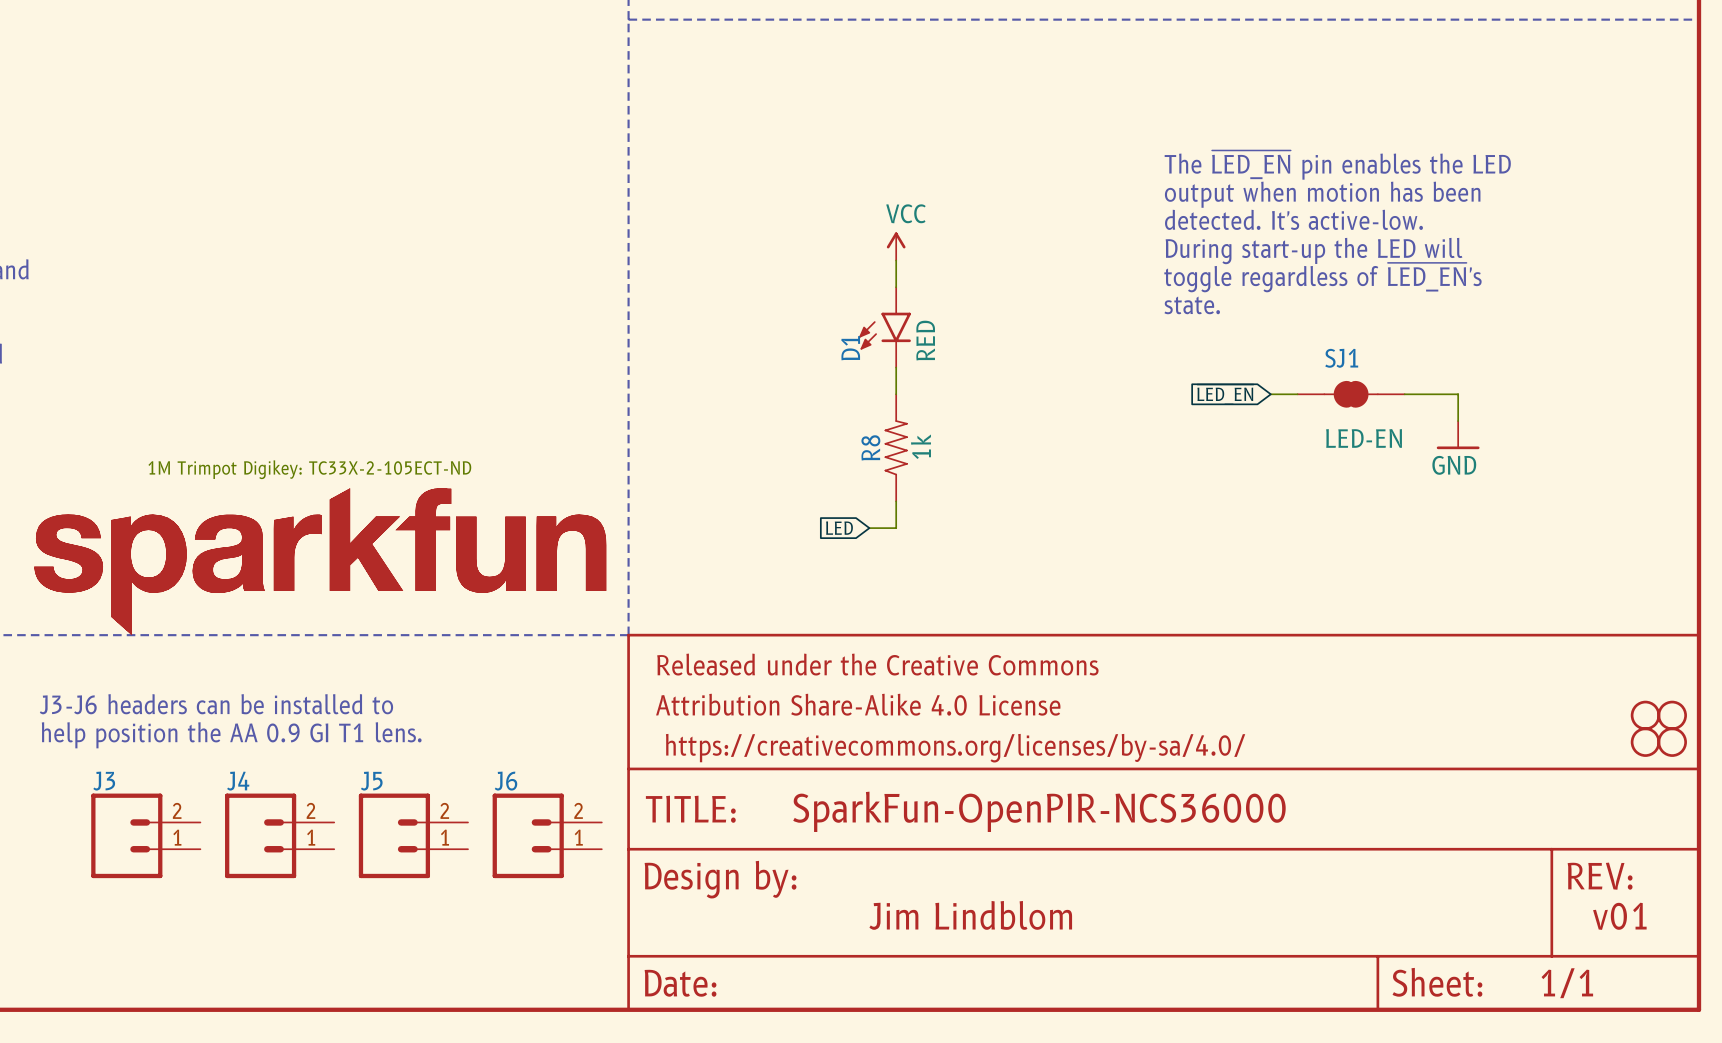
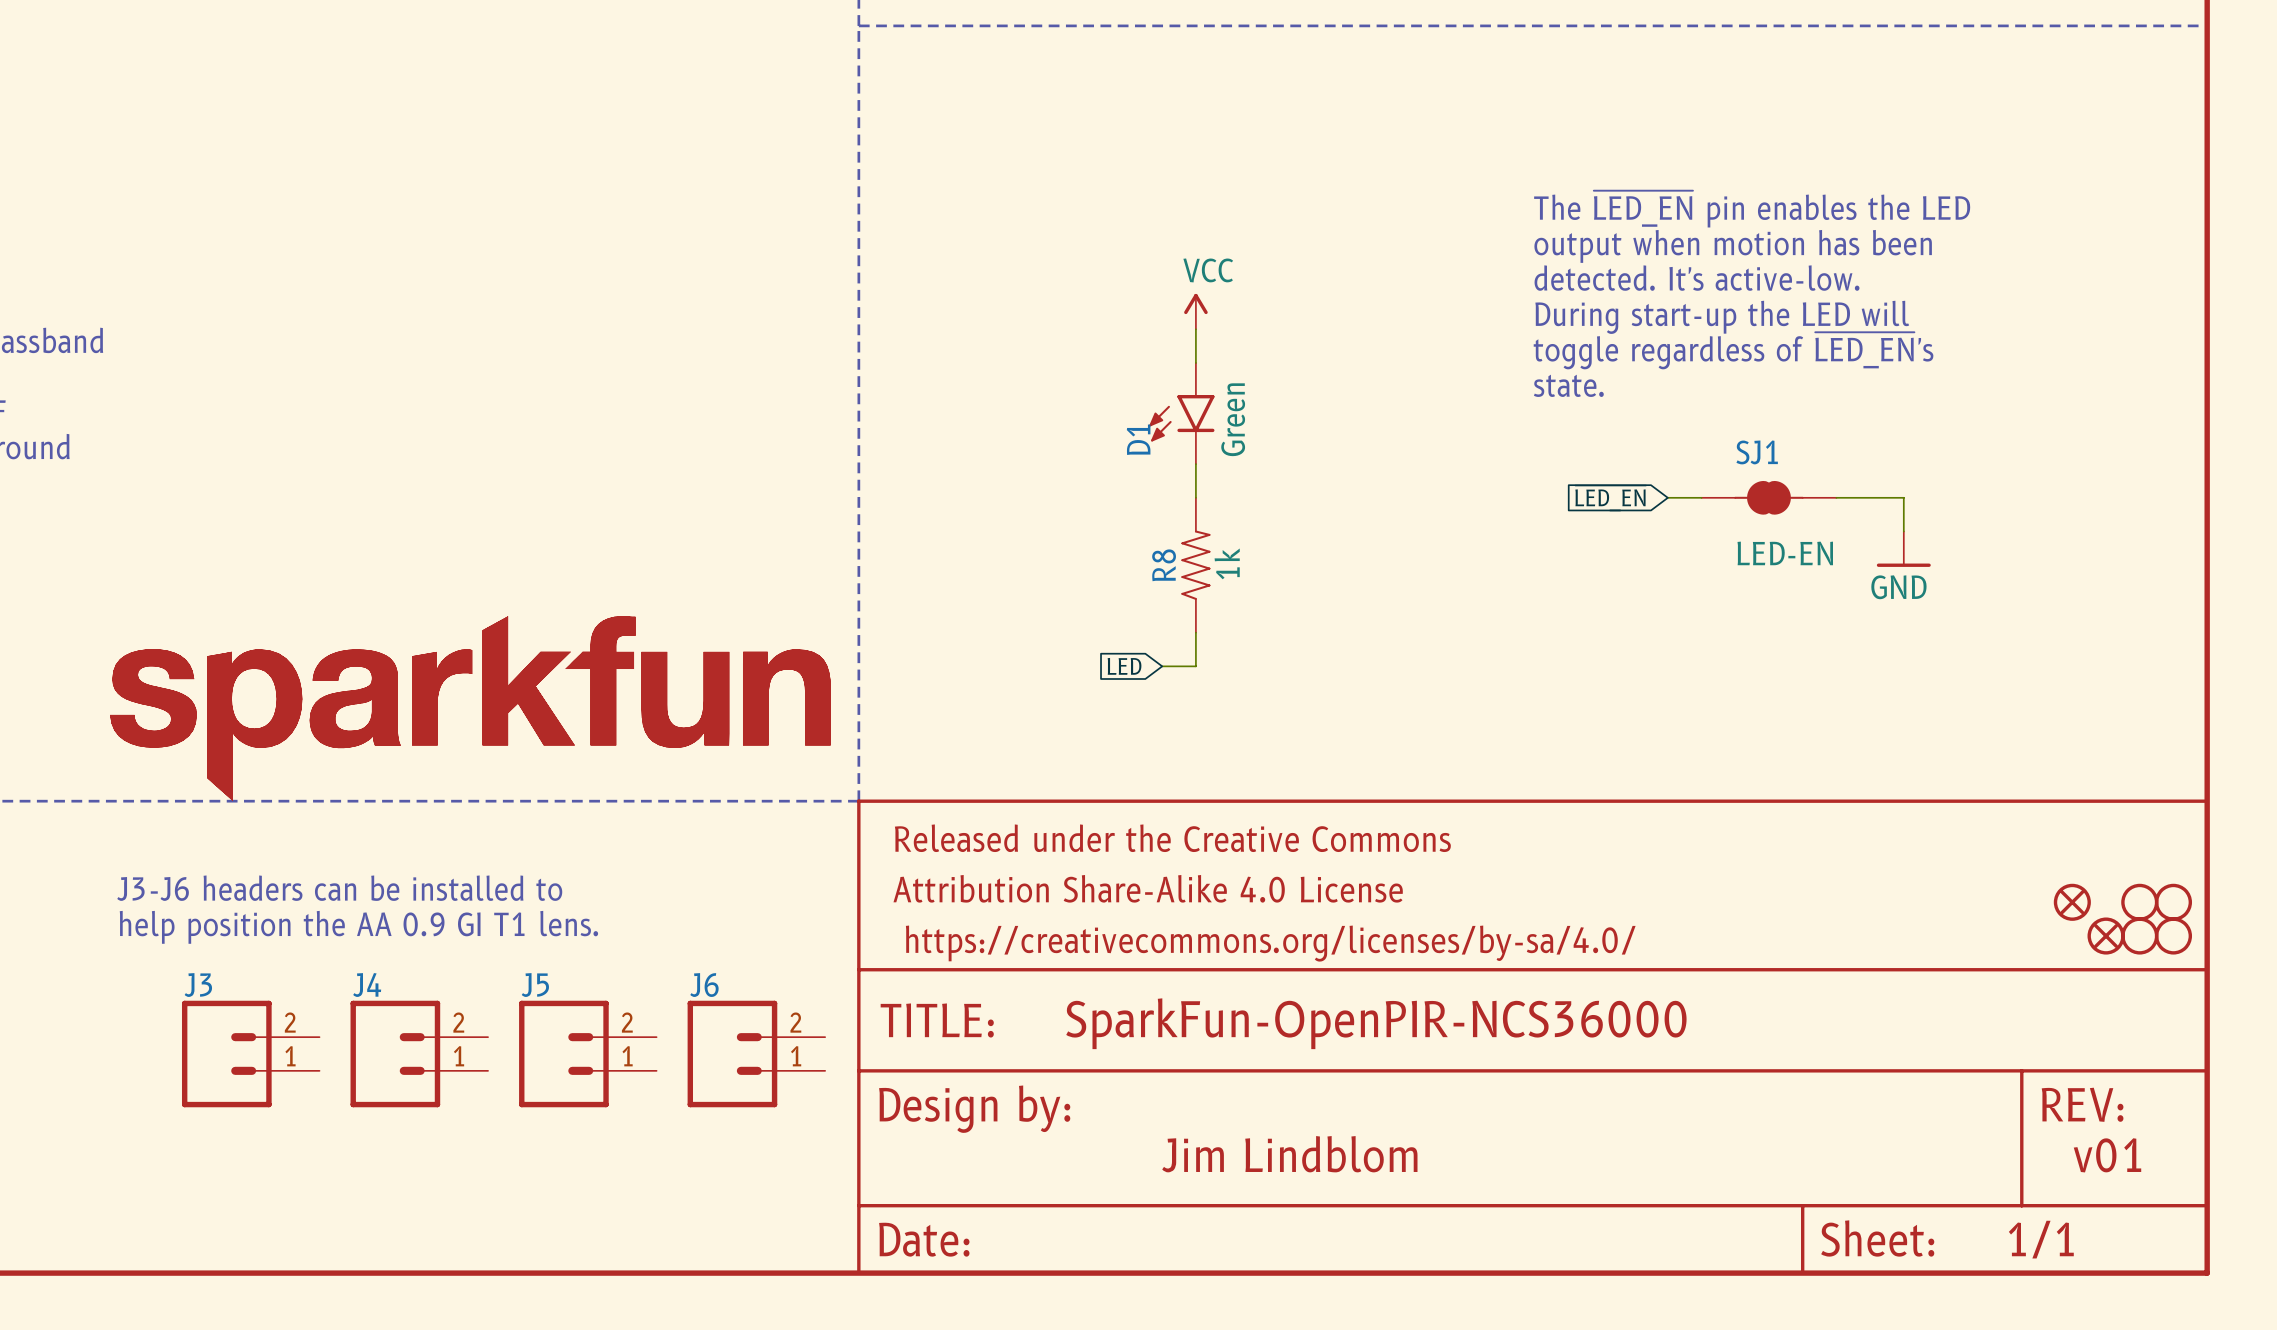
D1 value: RED (925, 340) -> Green (1233, 419)
text: 1M Trimpot Digikey: TC33X-2-105ECT-ND (309, 469) -> none
part: none -> (2072, 902)
part: none -> (2106, 936)

